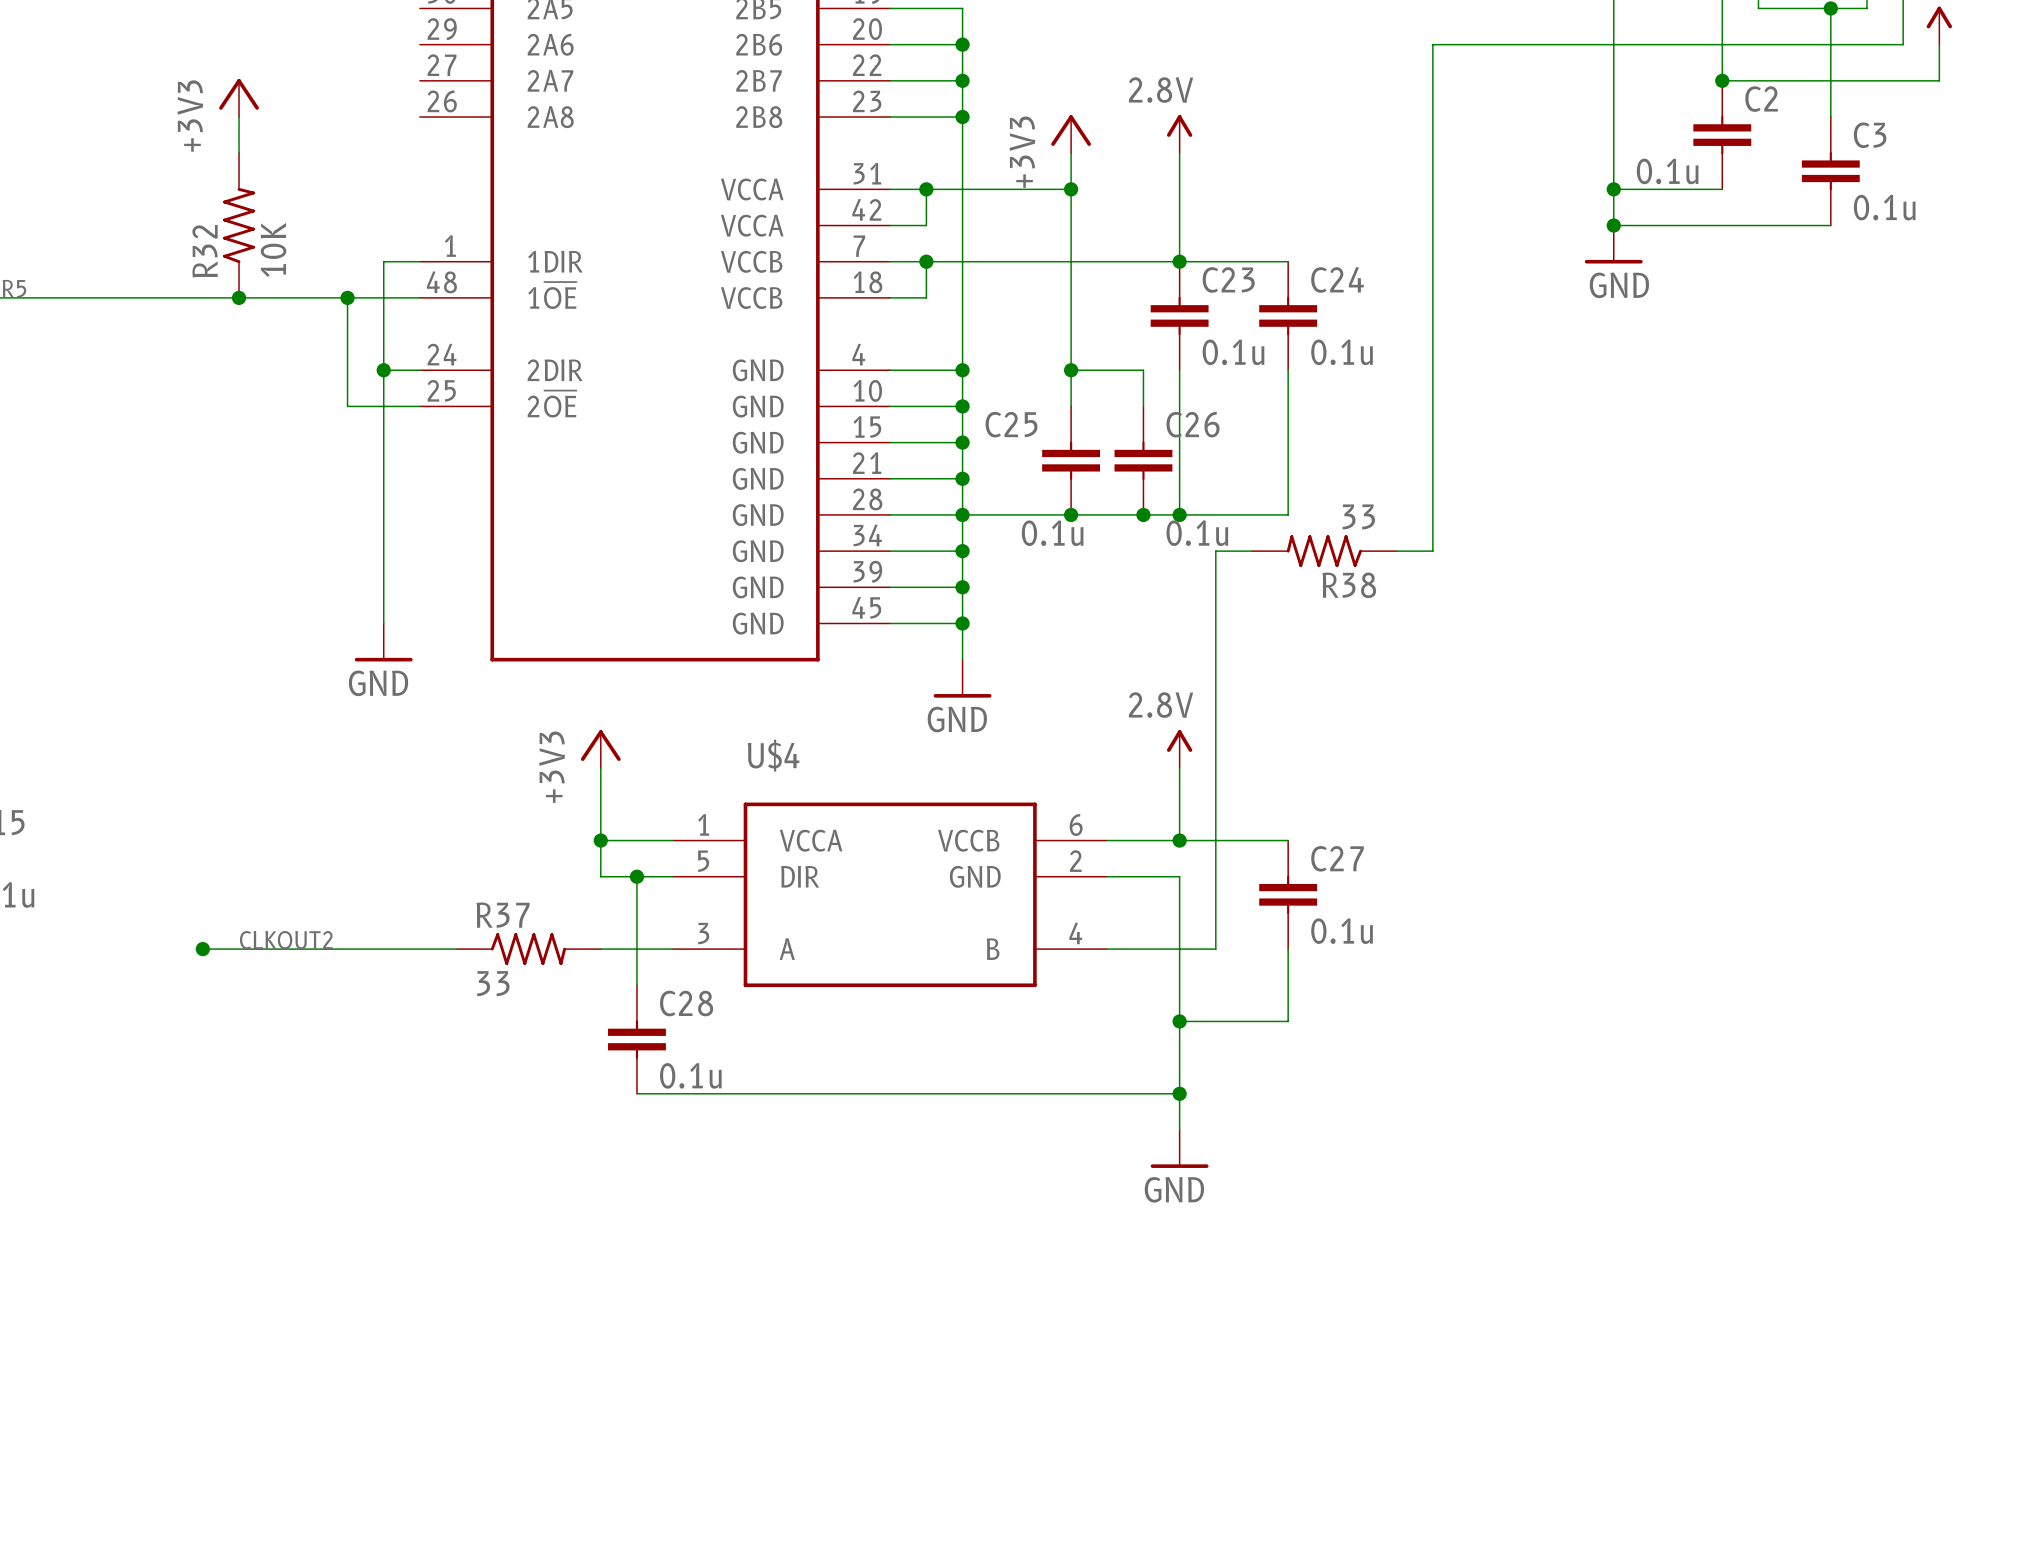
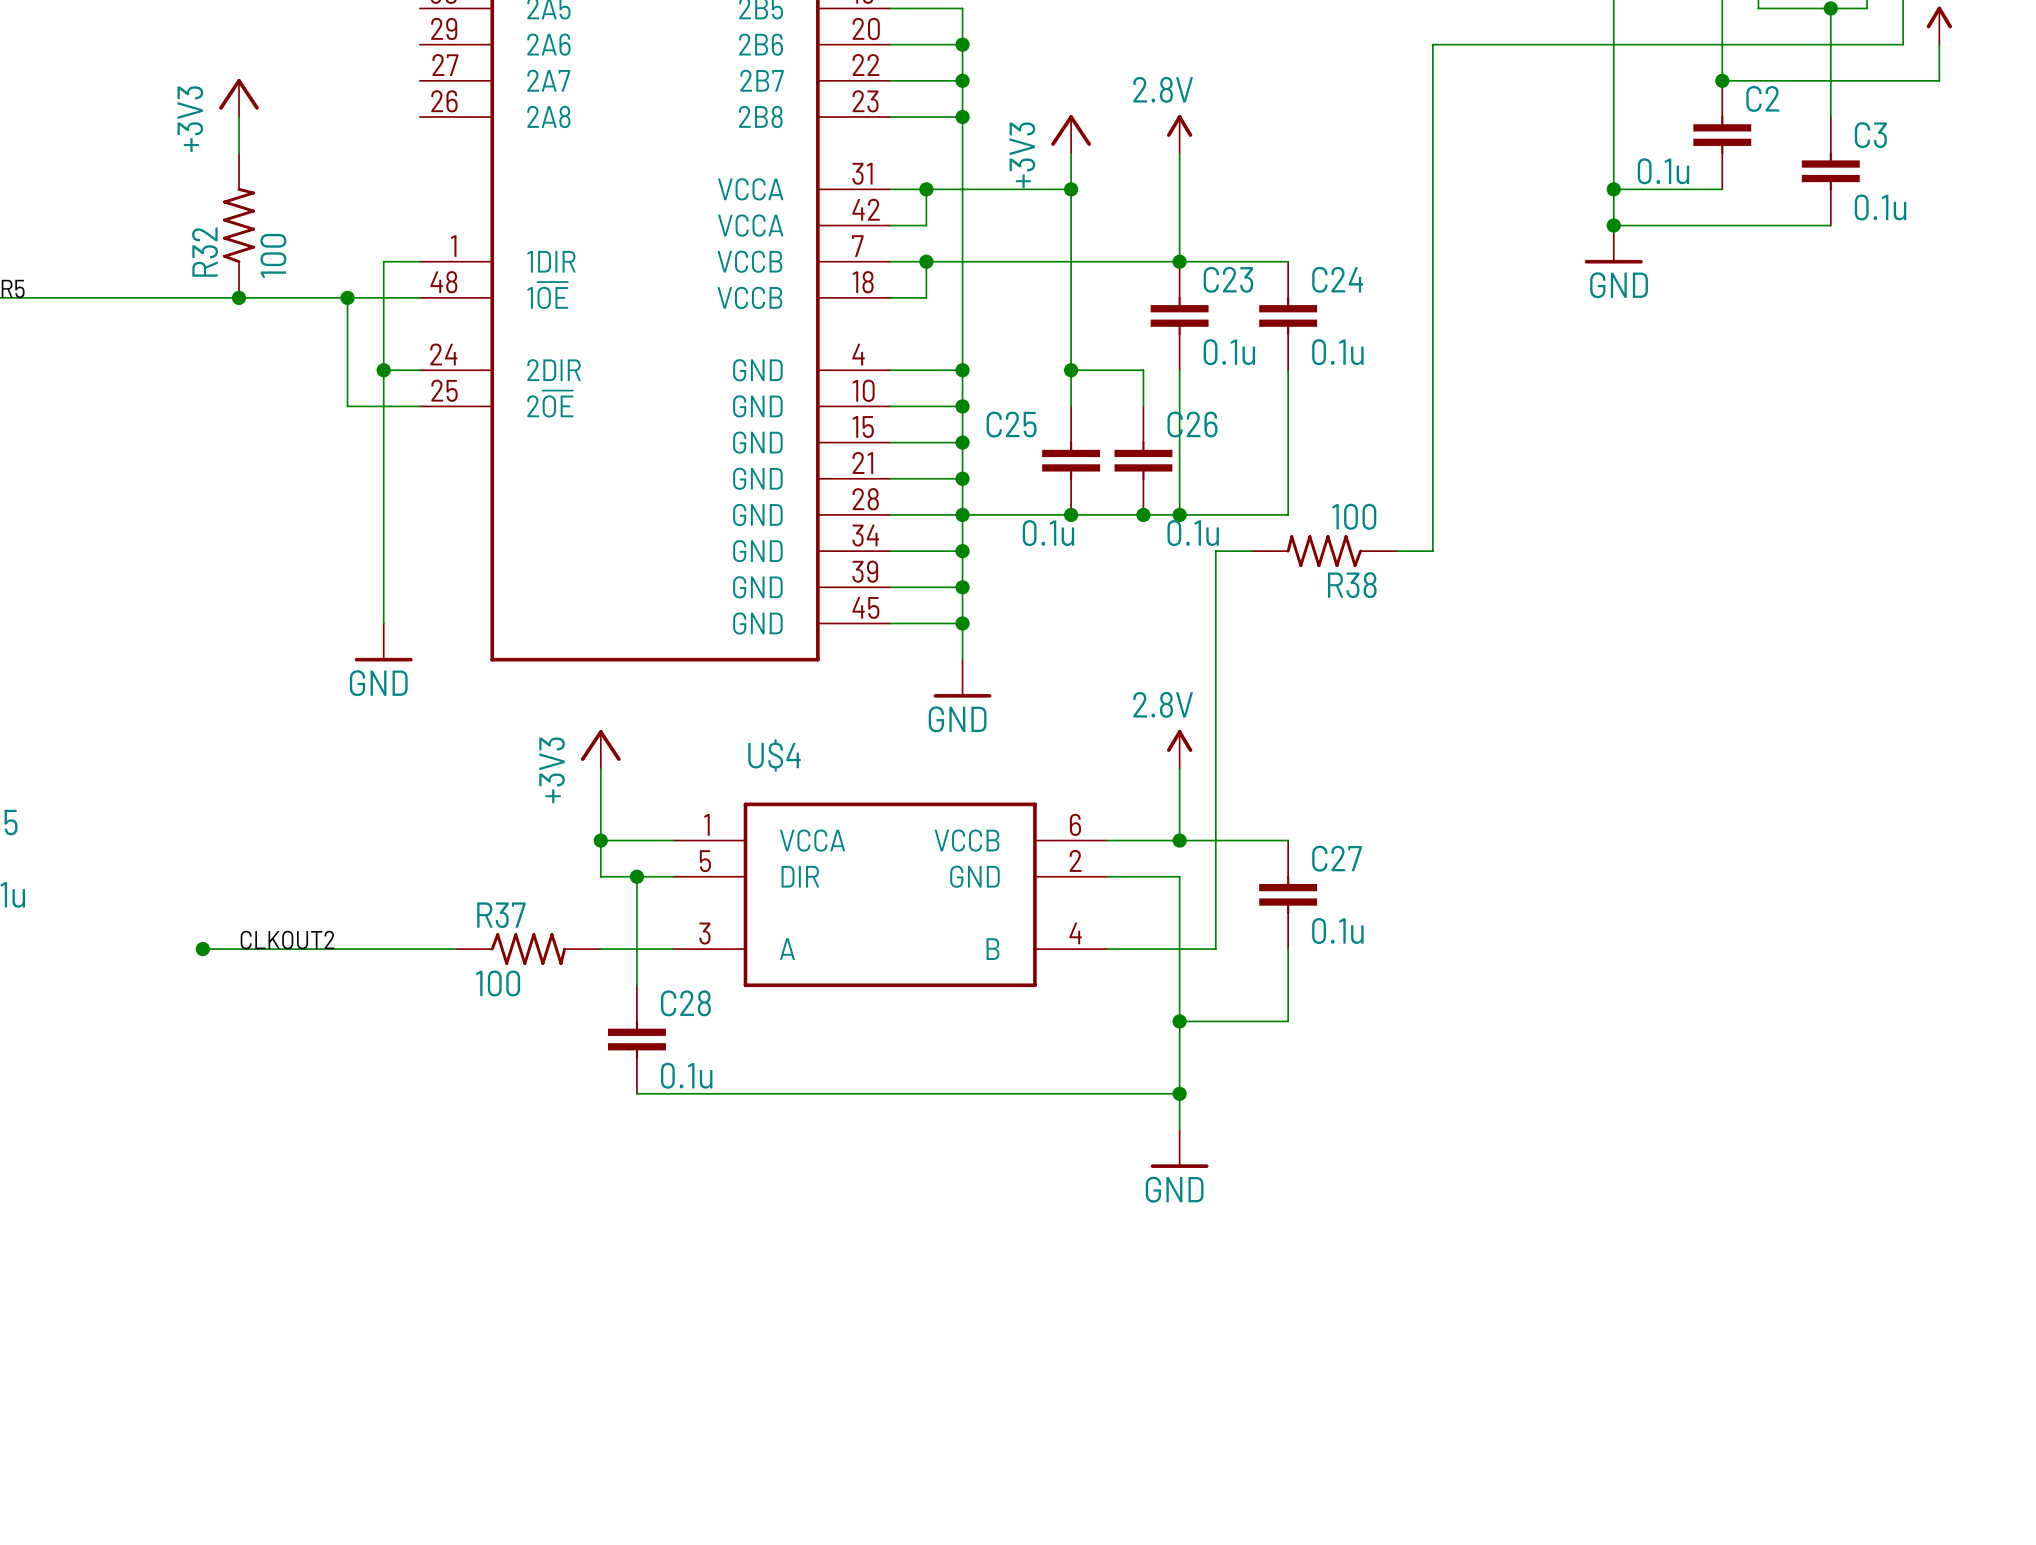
R32 value: 10K (273, 249) -> 100 (273, 255)
R38 value: 33 (1358, 516) -> 100 (1354, 516)
R37 value: 33 (493, 983) -> 100 (498, 983)

